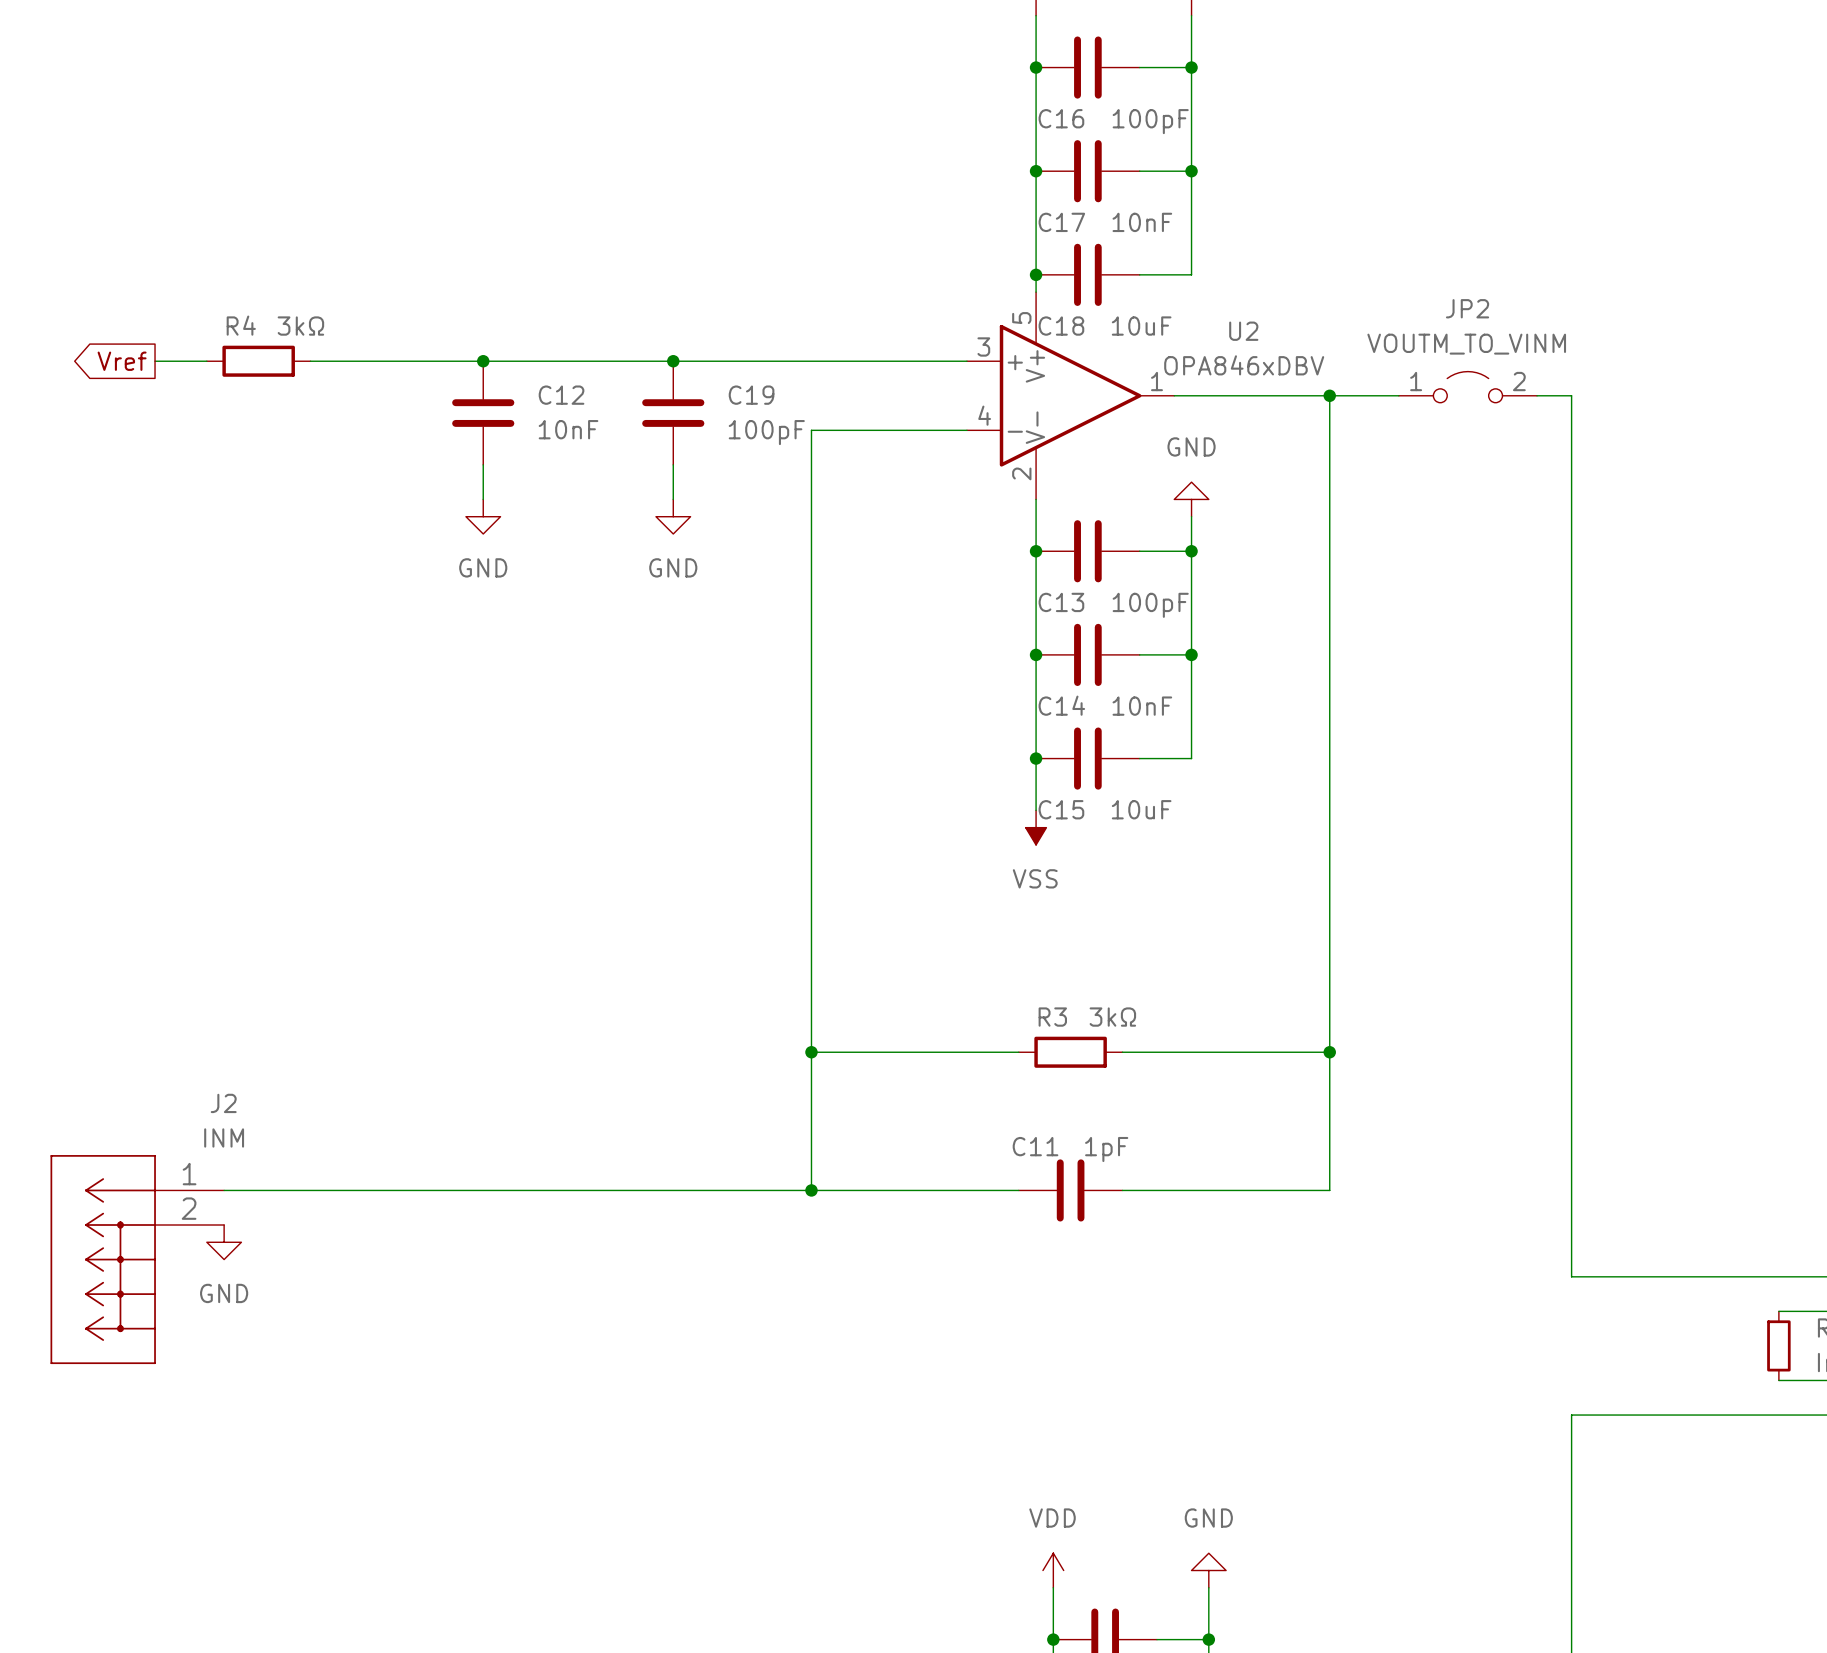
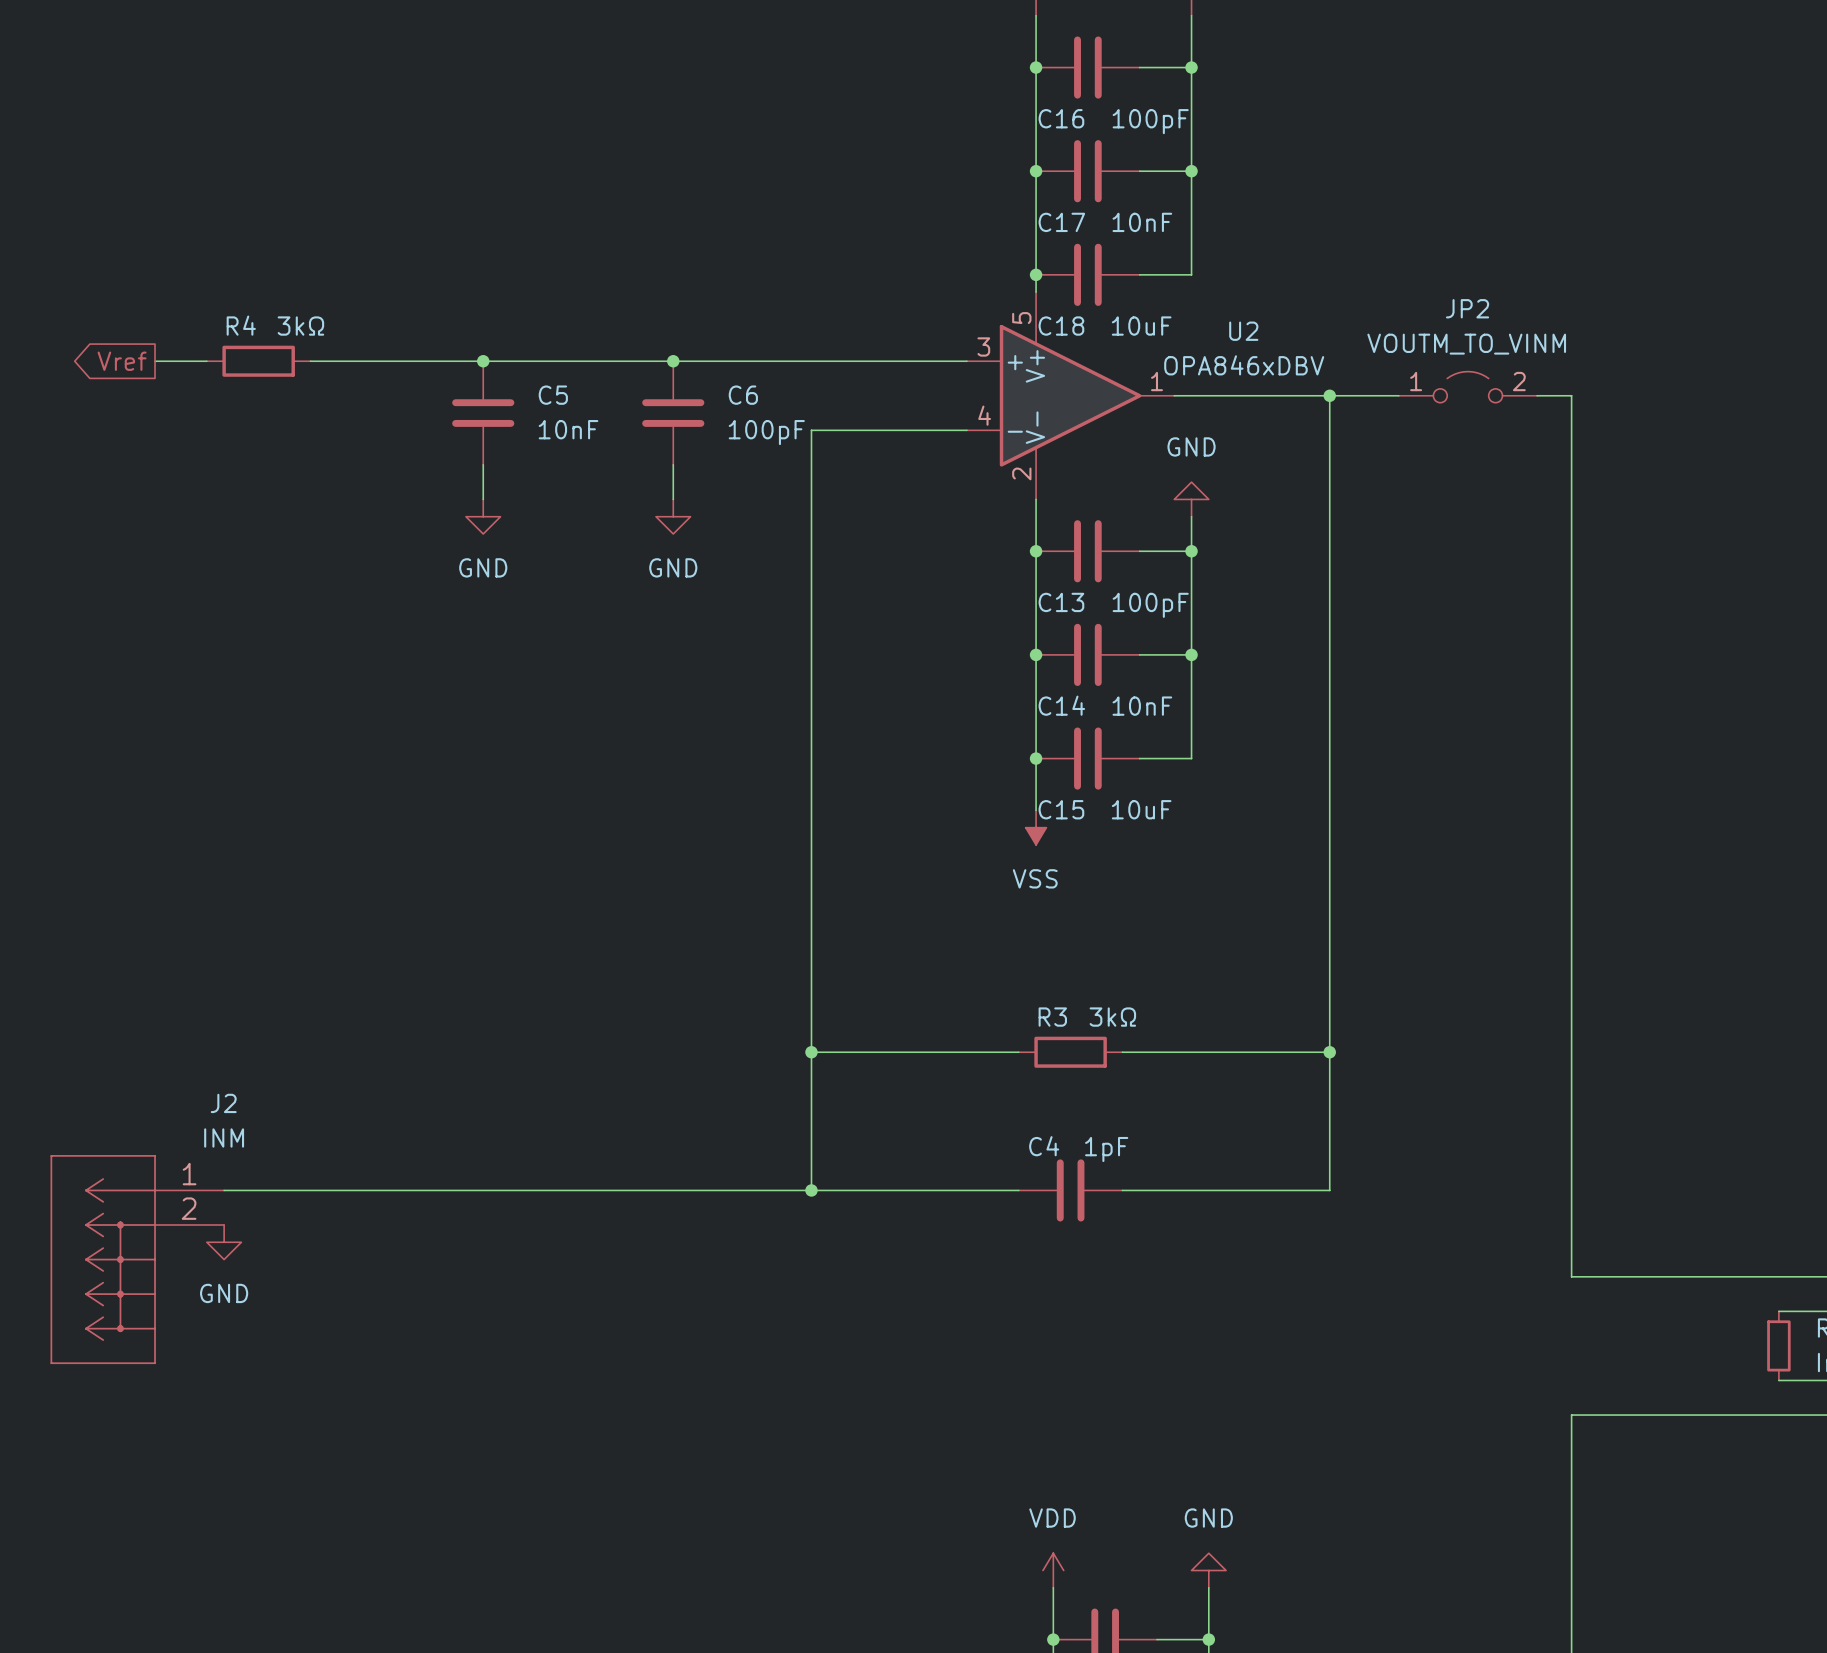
C12 name: C12 (561, 395) -> C5 (553, 395)
C19 name: C19 (751, 395) -> C6 (743, 395)
C11 name: C11 (1035, 1146) -> C4 (1044, 1146)

